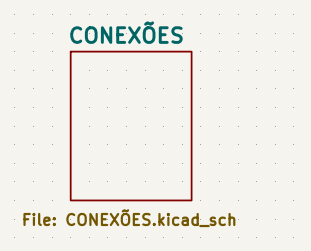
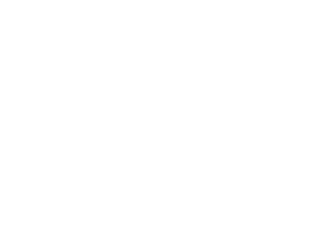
sheet CONEXÕES: File: CONEXÕES.kicad_sch (131, 126) -> none

